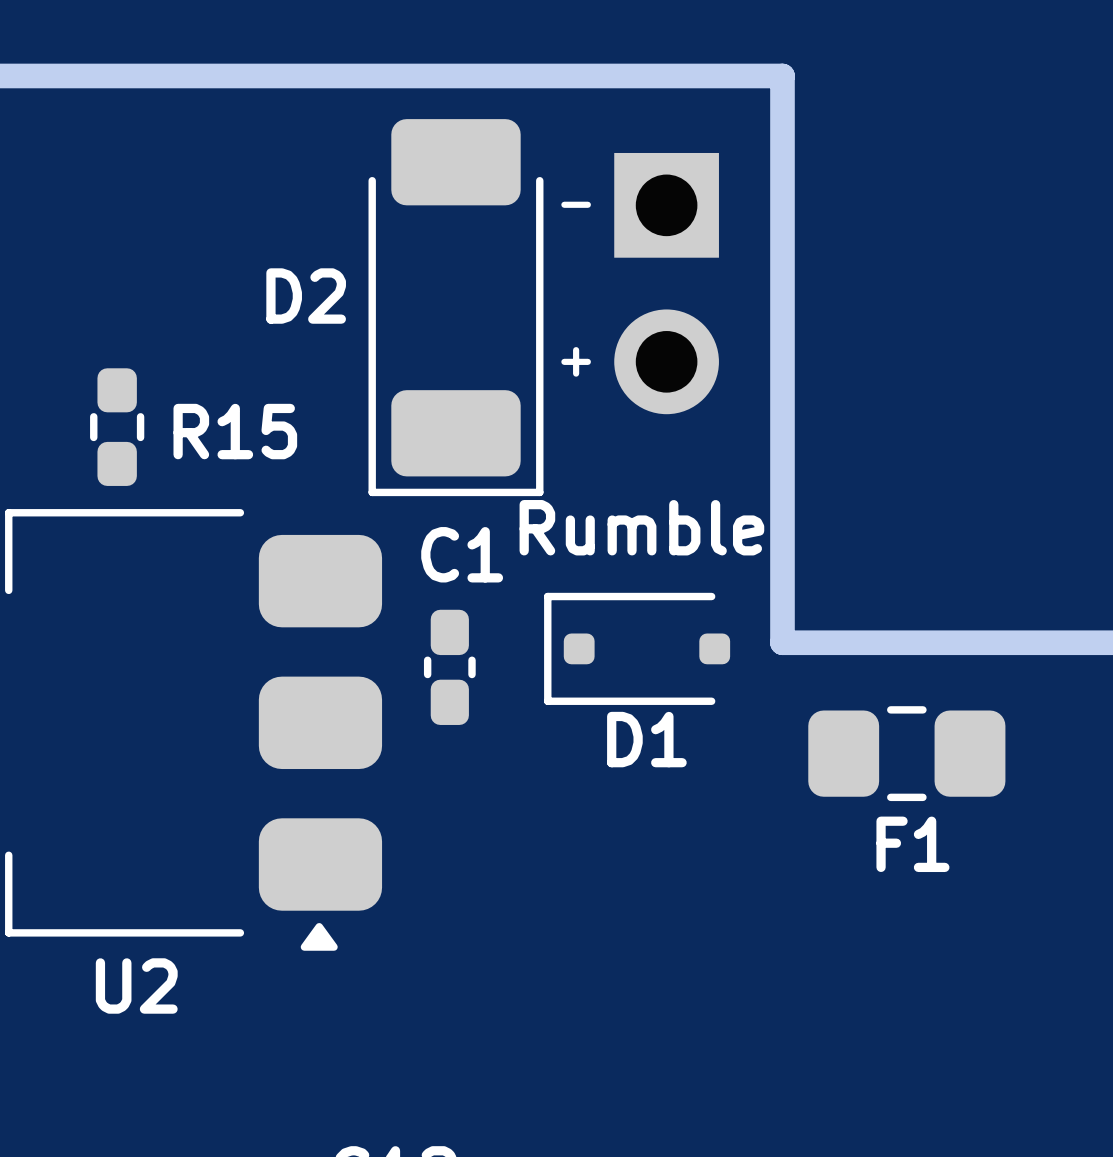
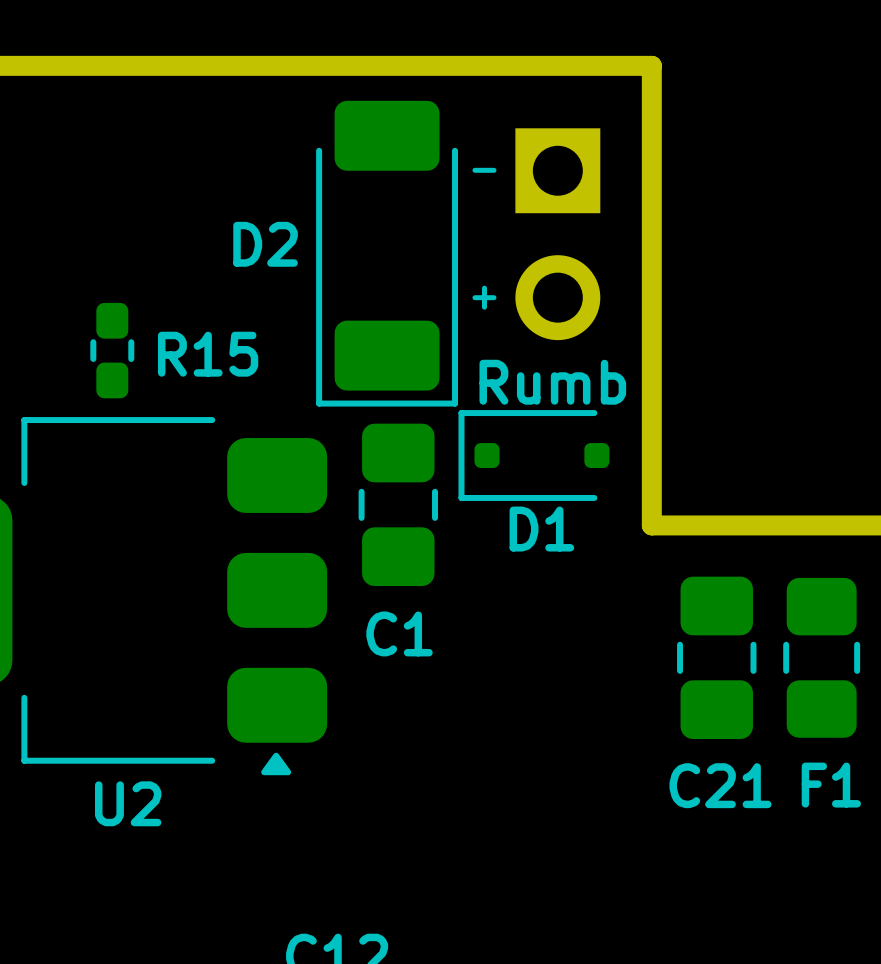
text: Rumble (641, 527) -> Rumb (552, 382)
C1 name position: C1 (462, 554) -> C1 (399, 633)
C1 footprint: [423, 609, 476, 725] -> [358, 423, 439, 587]
D1 position: (637, 648) -> (533, 455)
F1 rotation: 0° (906, 753) -> 90° clockwise (821, 657)
C21: none -> (716, 657)

